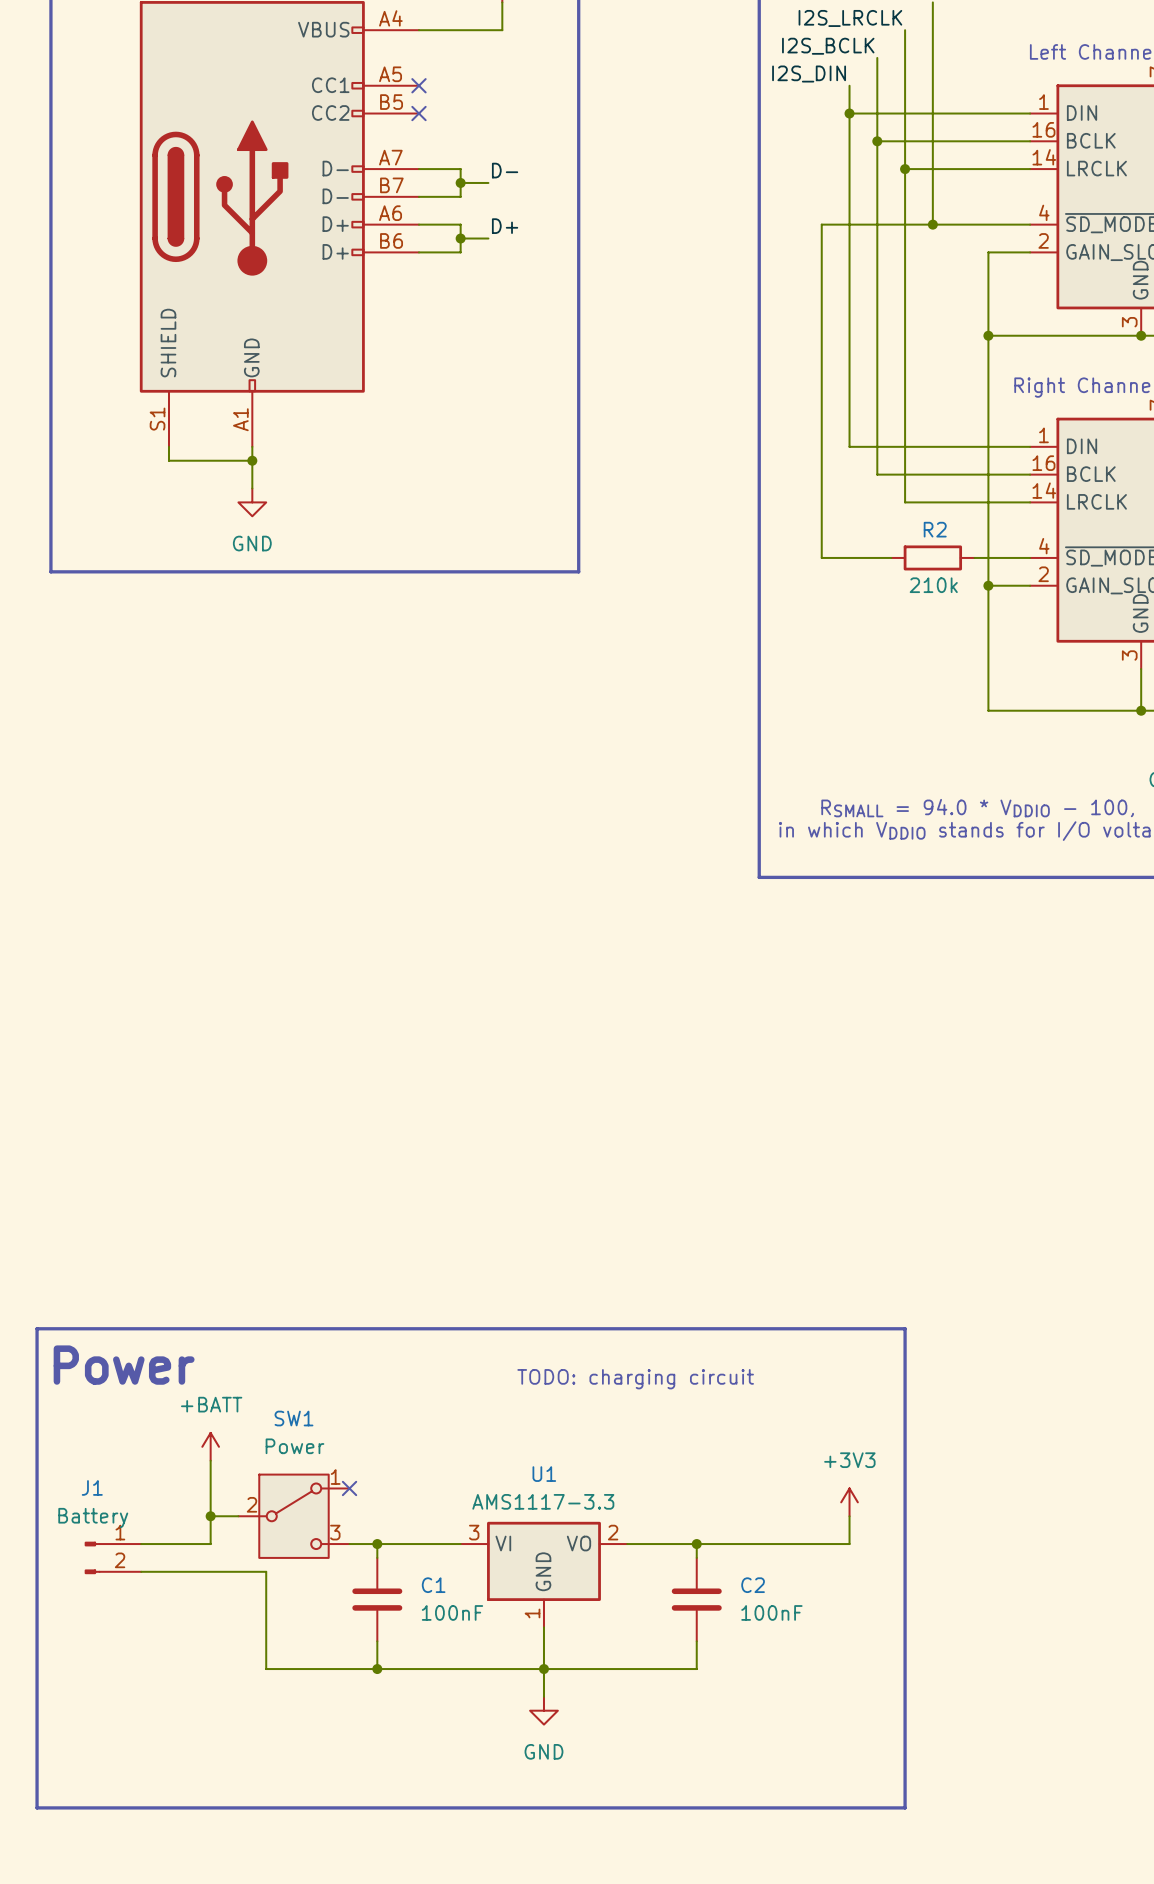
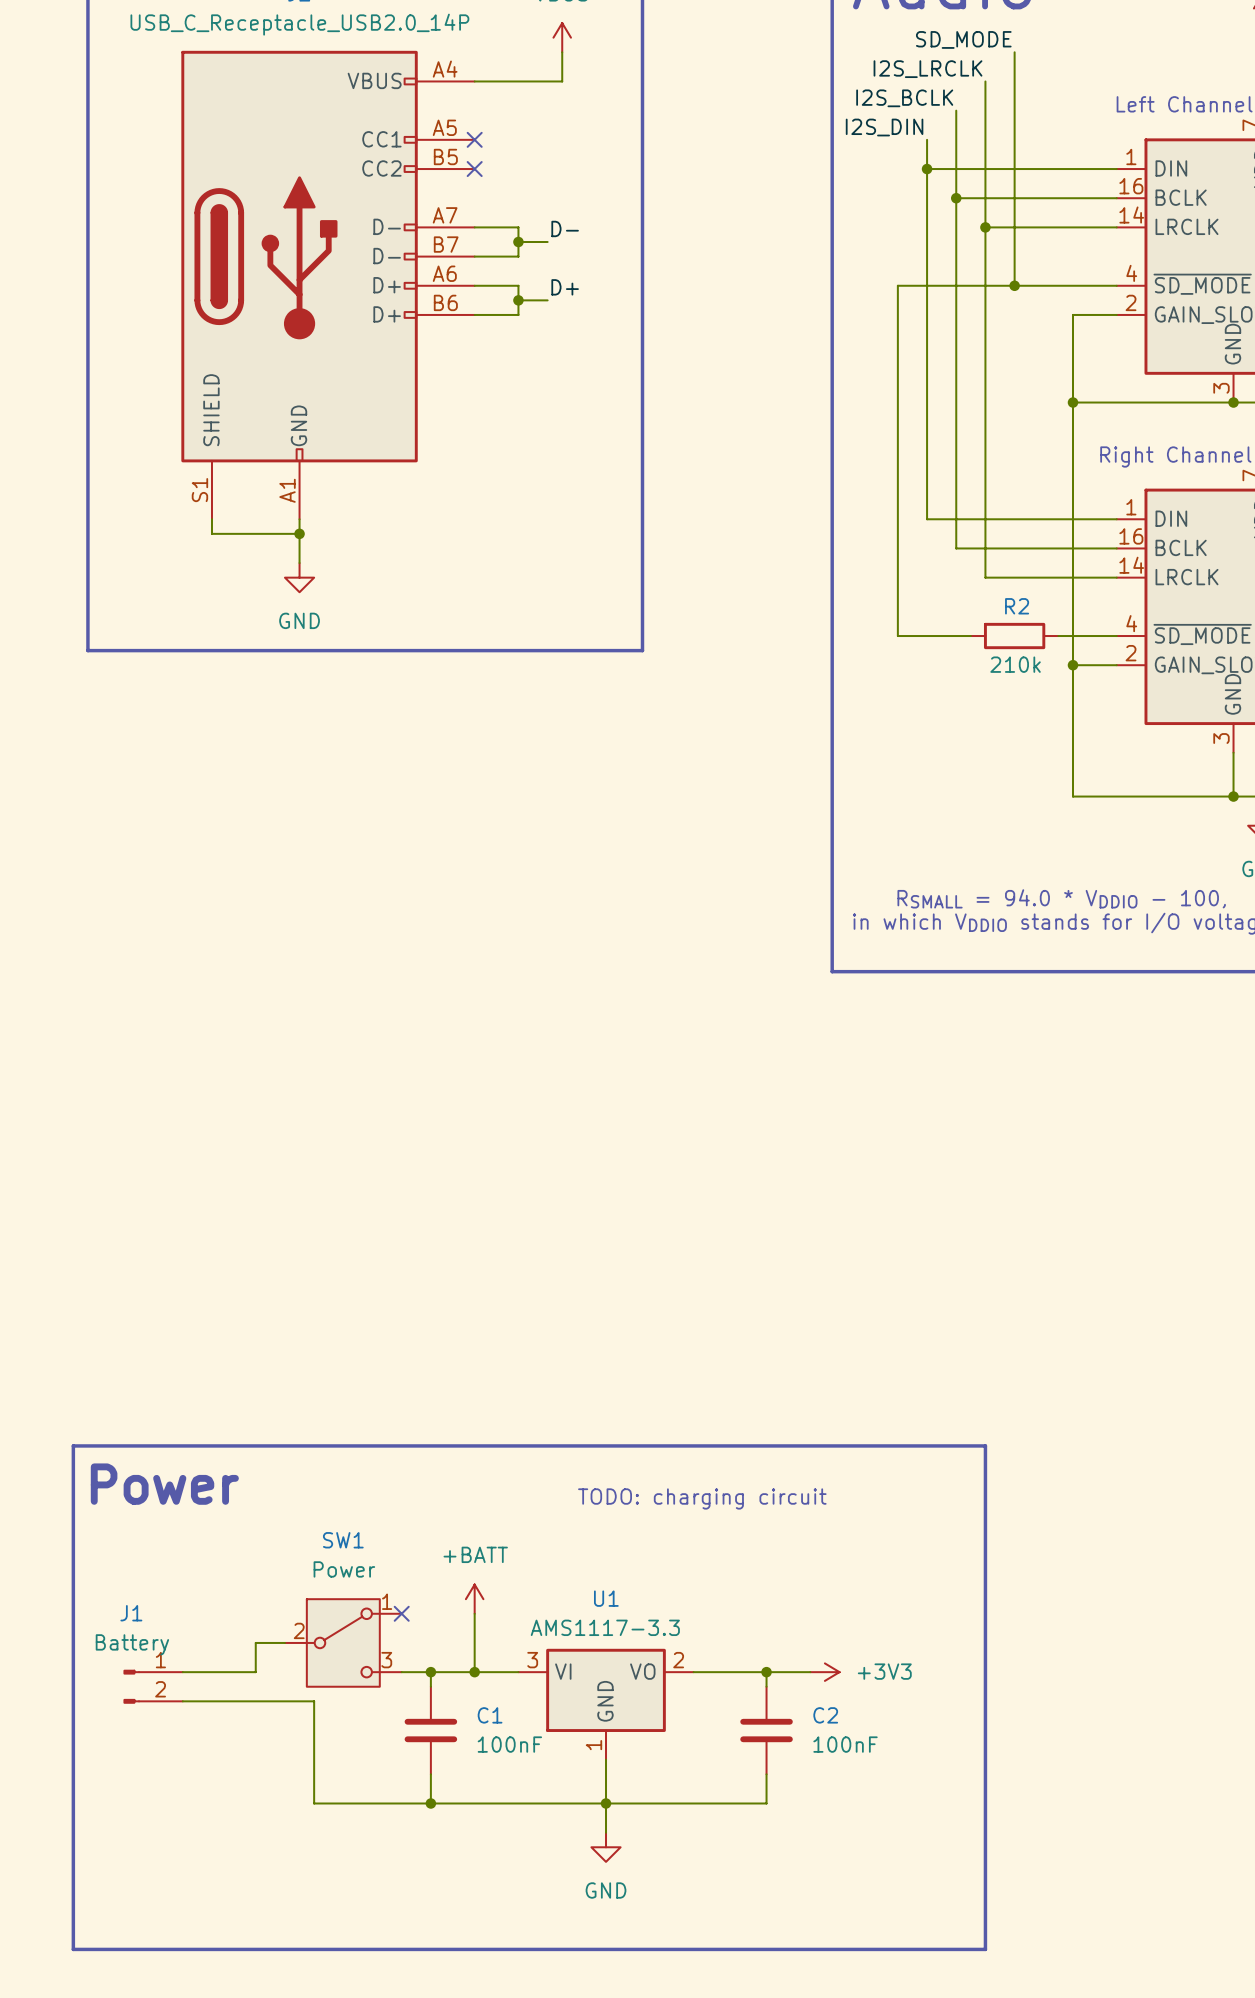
power symbol position: +BATT (210, 1446) -> +BATT (474, 1599)
wire: (210, 1460) (210, 1516) -> (474, 1613) (474, 1672)
power symbol rotation: 0° (849, 1502) -> 90° clockwise (824, 1672)
power symbol position: +3V3 (849, 1502) -> +3V3 (824, 1672)
junction: (210, 1516) -> none
wire: (849, 1516) (849, 1544) (738, 1544) -> none
junction: none -> (474, 1672)

